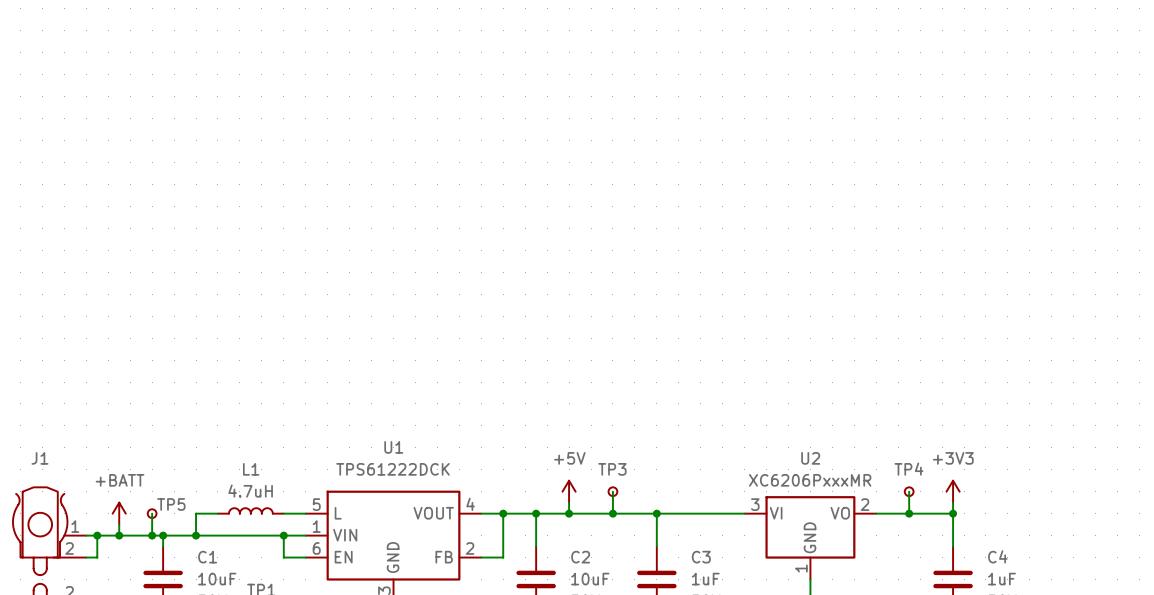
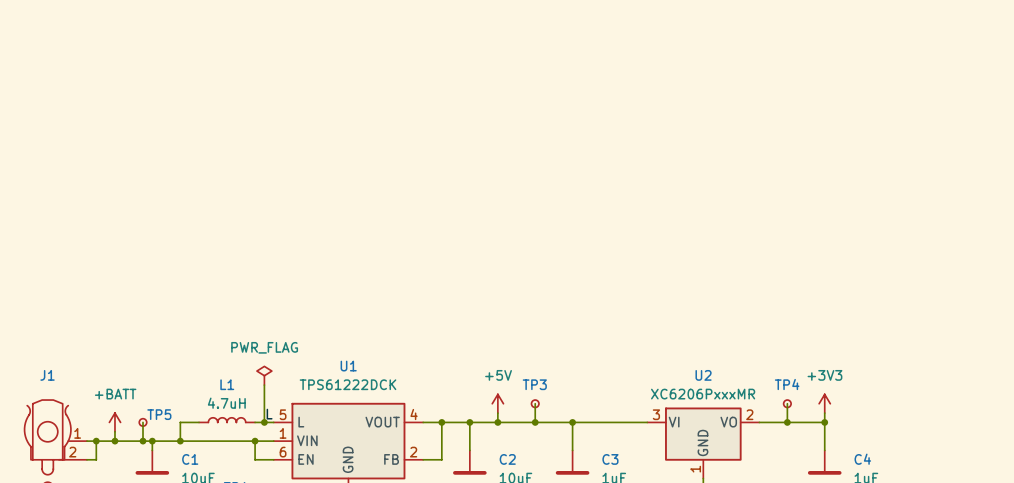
power symbol: none -> PWR_FLAG (264, 375)
wire: none -> (264, 385) (264, 422)
label: none -> L (269, 414)
junction: none -> (264, 422)

